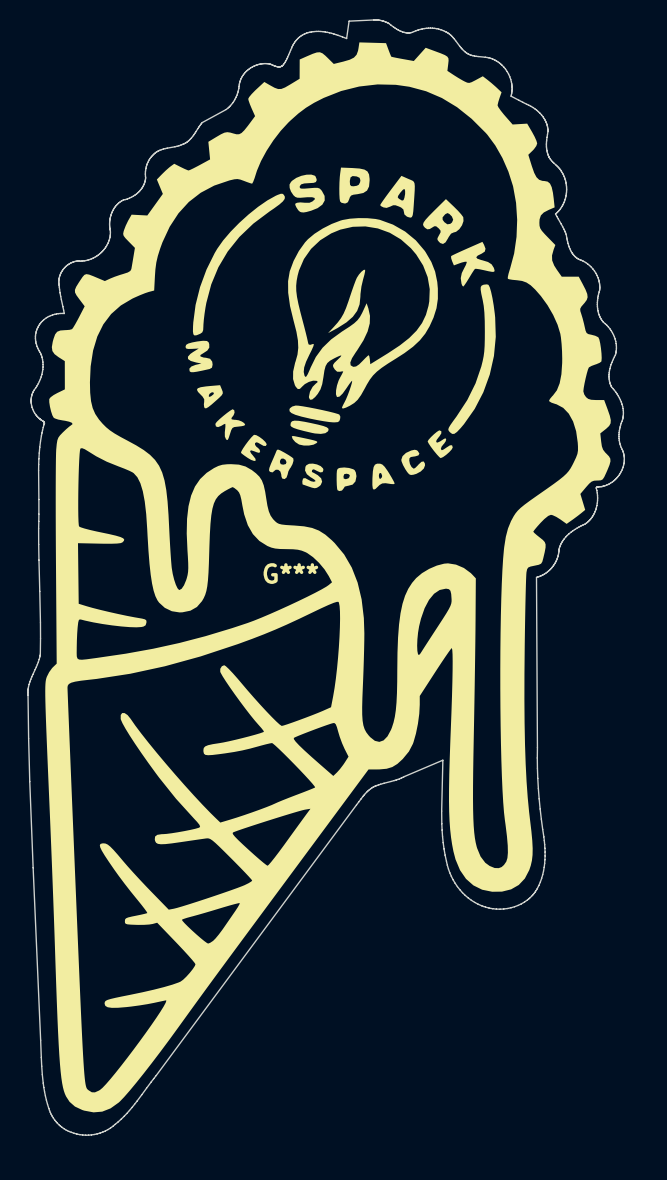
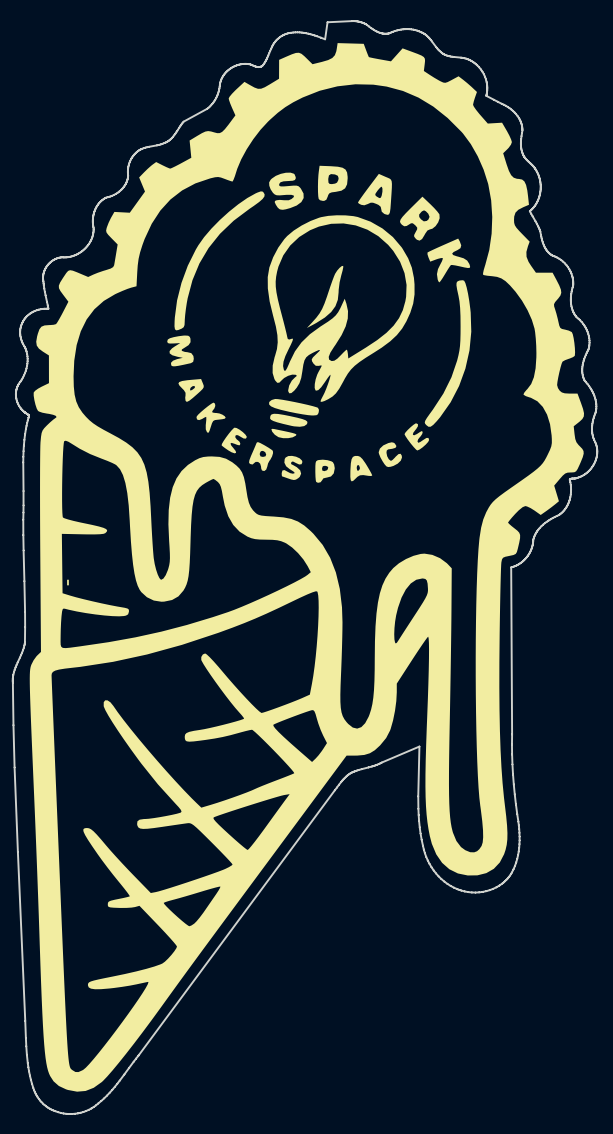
G*** name: G*** (290, 573) -> - (67, 582)

